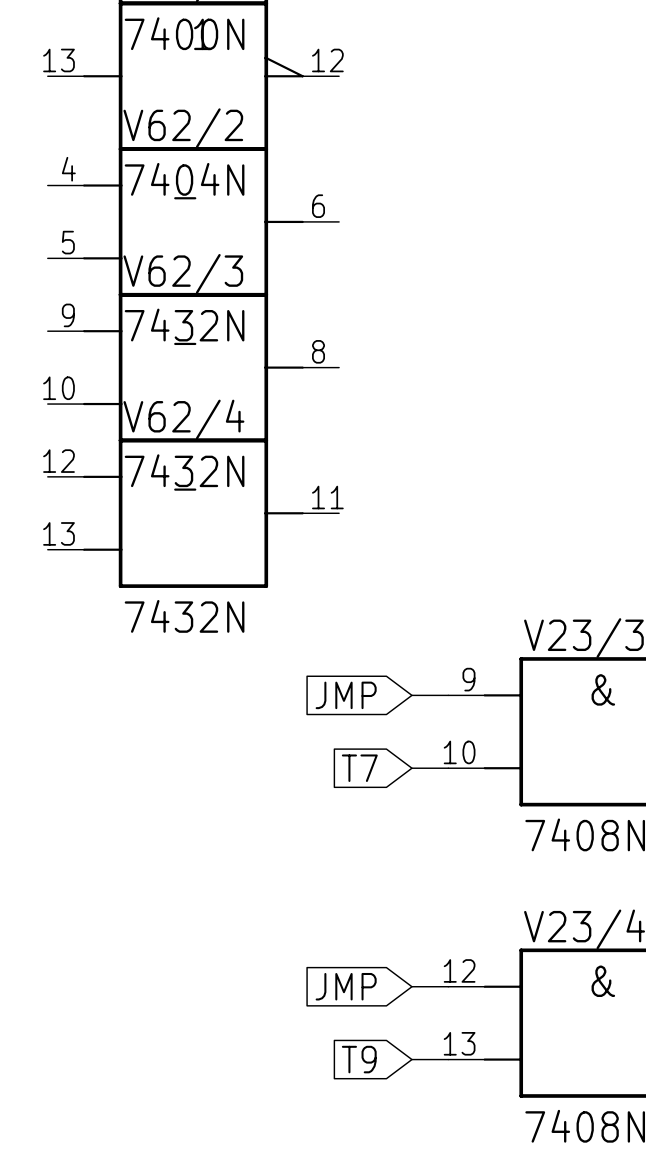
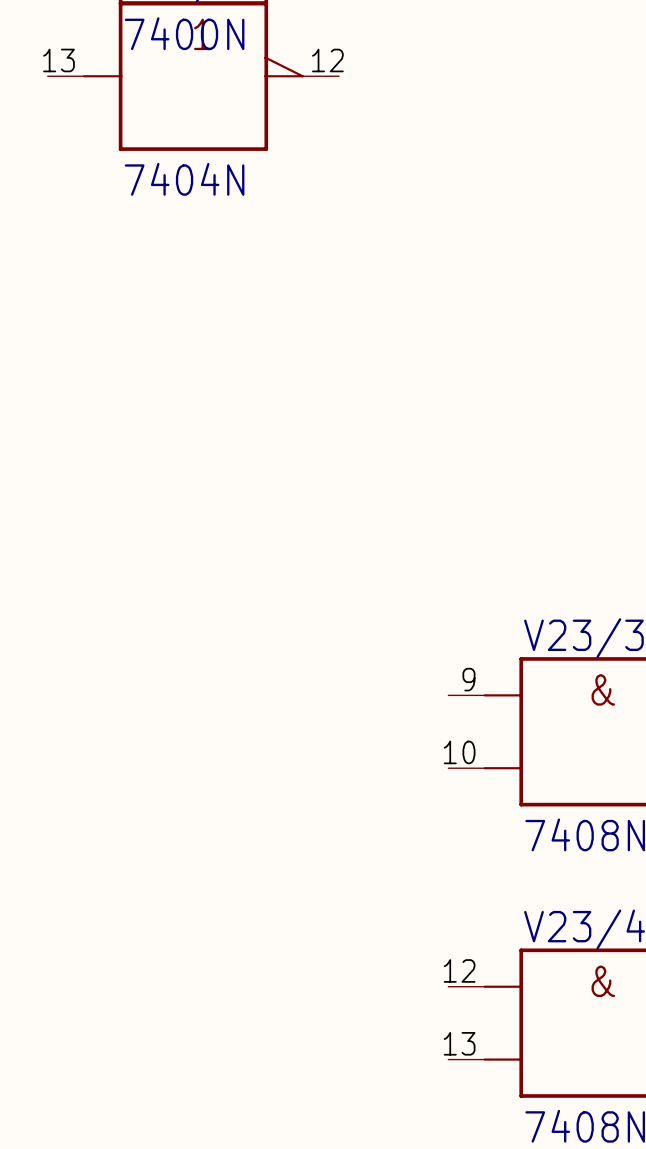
V62/2: 7432N (193, 221) -> none
V62/3: 7432N (193, 367) -> none
V62/4: 7432N (193, 513) -> none
global label: JMP (346, 695) -> none
wire: (411, 695) (448, 695) -> none
global label: T7 (359, 768) -> none
wire: (411, 768) (448, 768) -> none
global label: JMP (346, 986) -> none
wire: (411, 986) (448, 986) -> none
global label: T9 (359, 1059) -> none
wire: (411, 1059) (448, 1059) -> none

